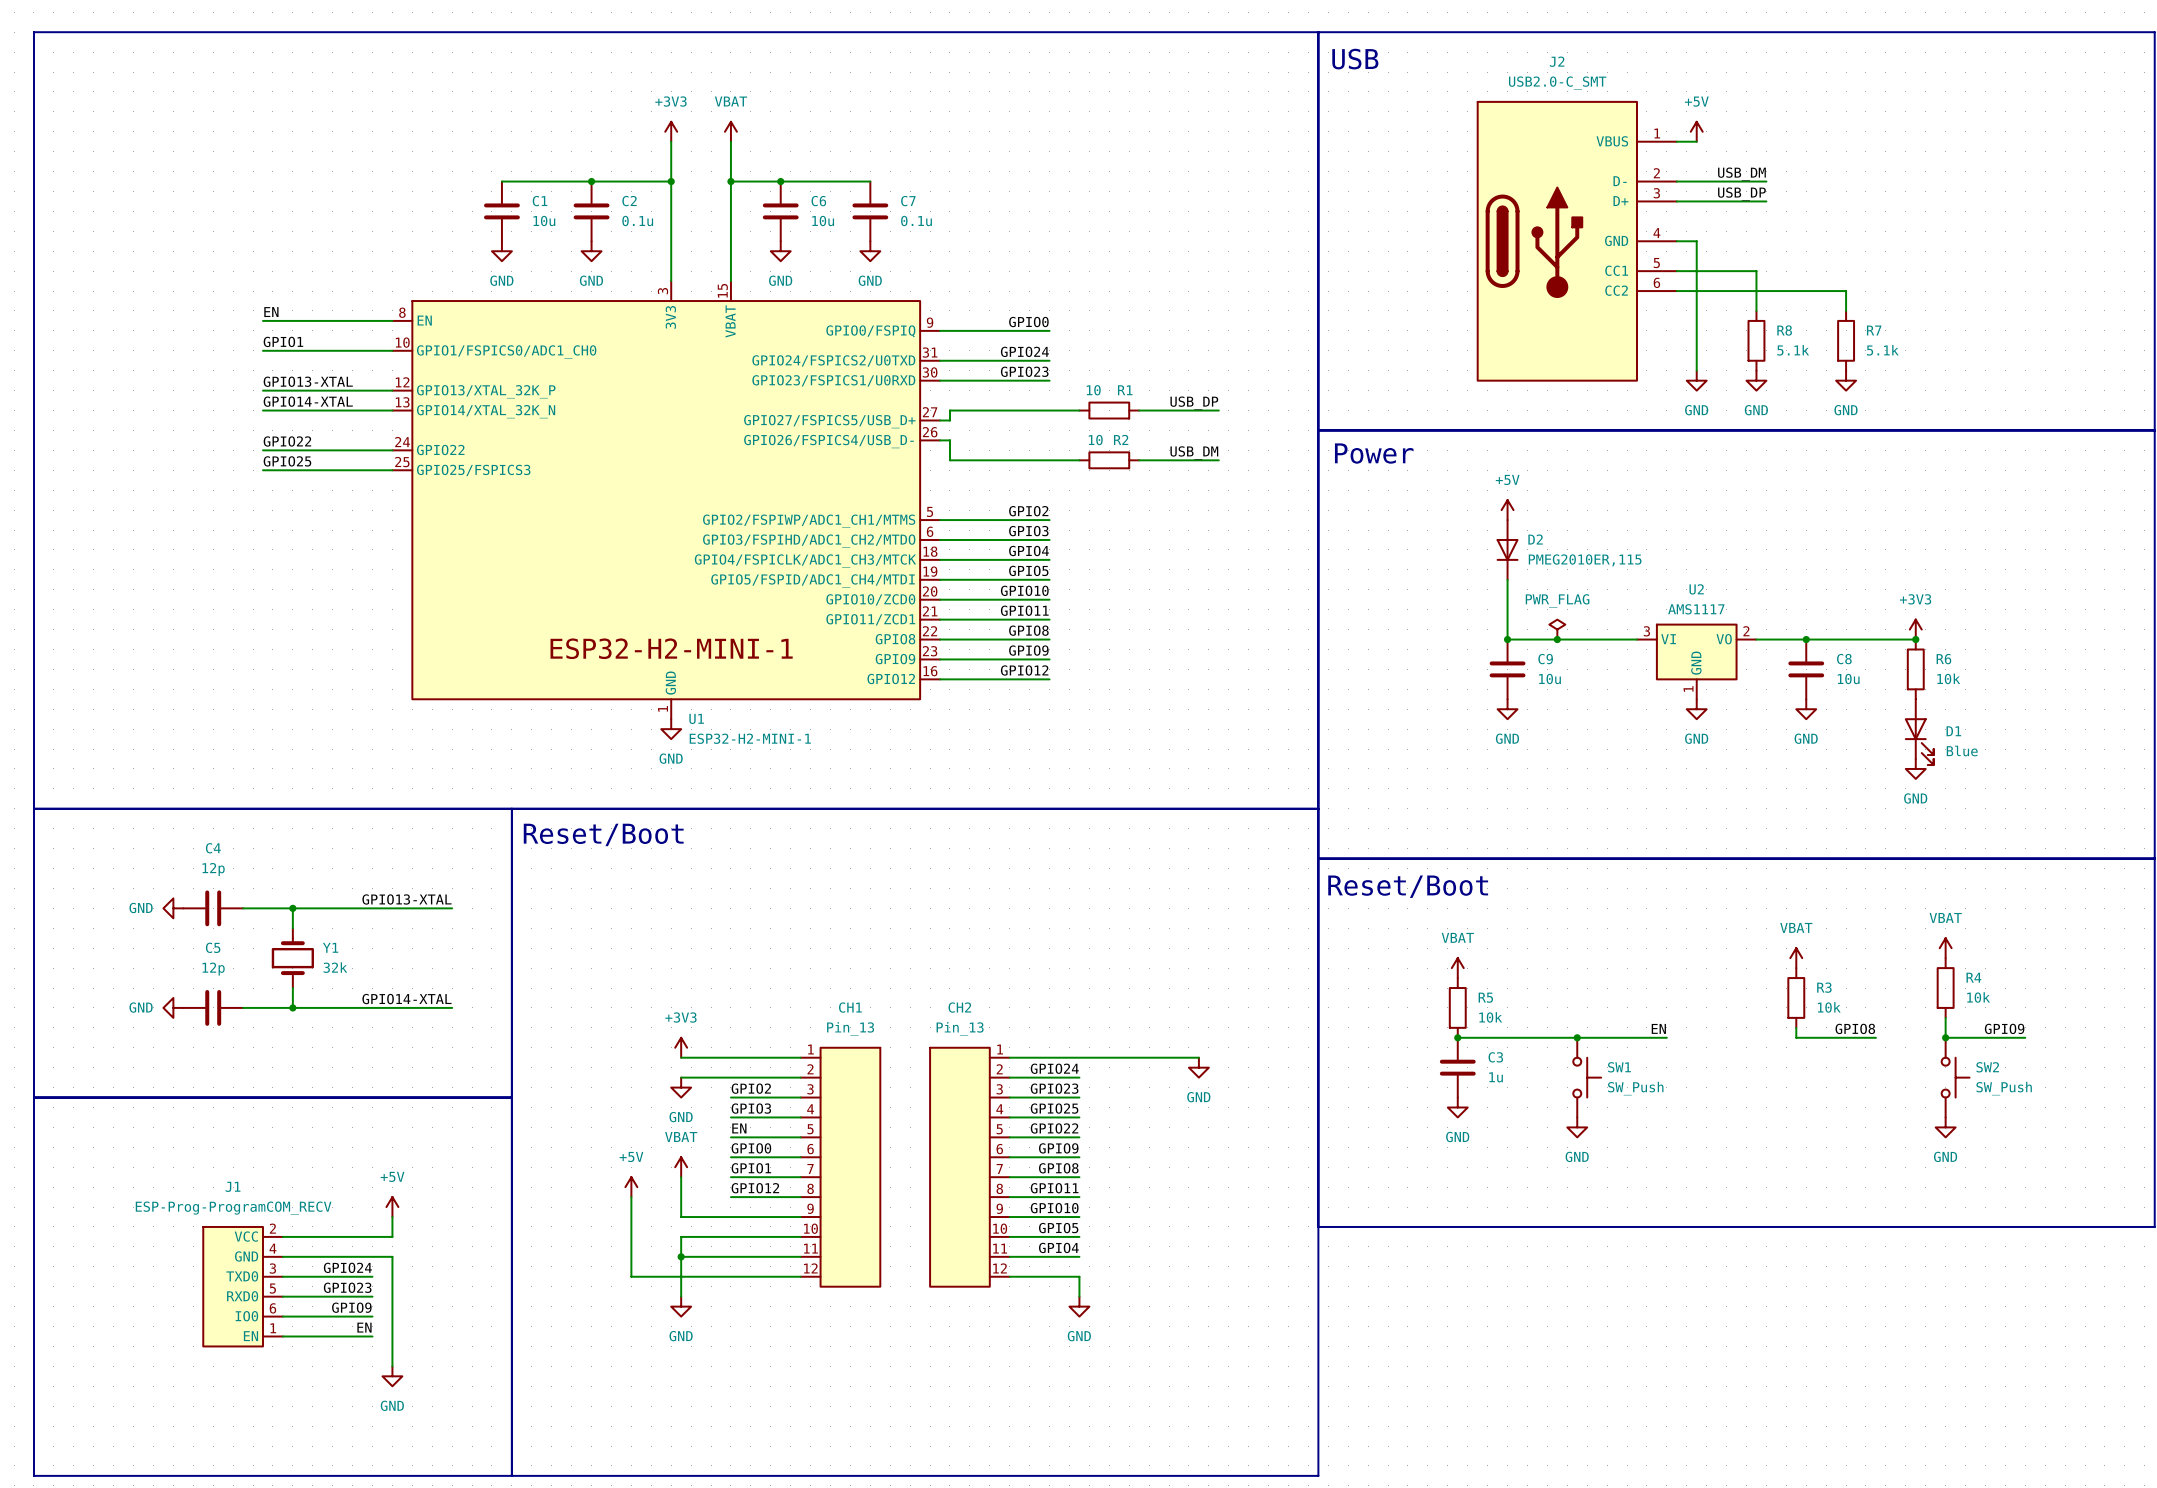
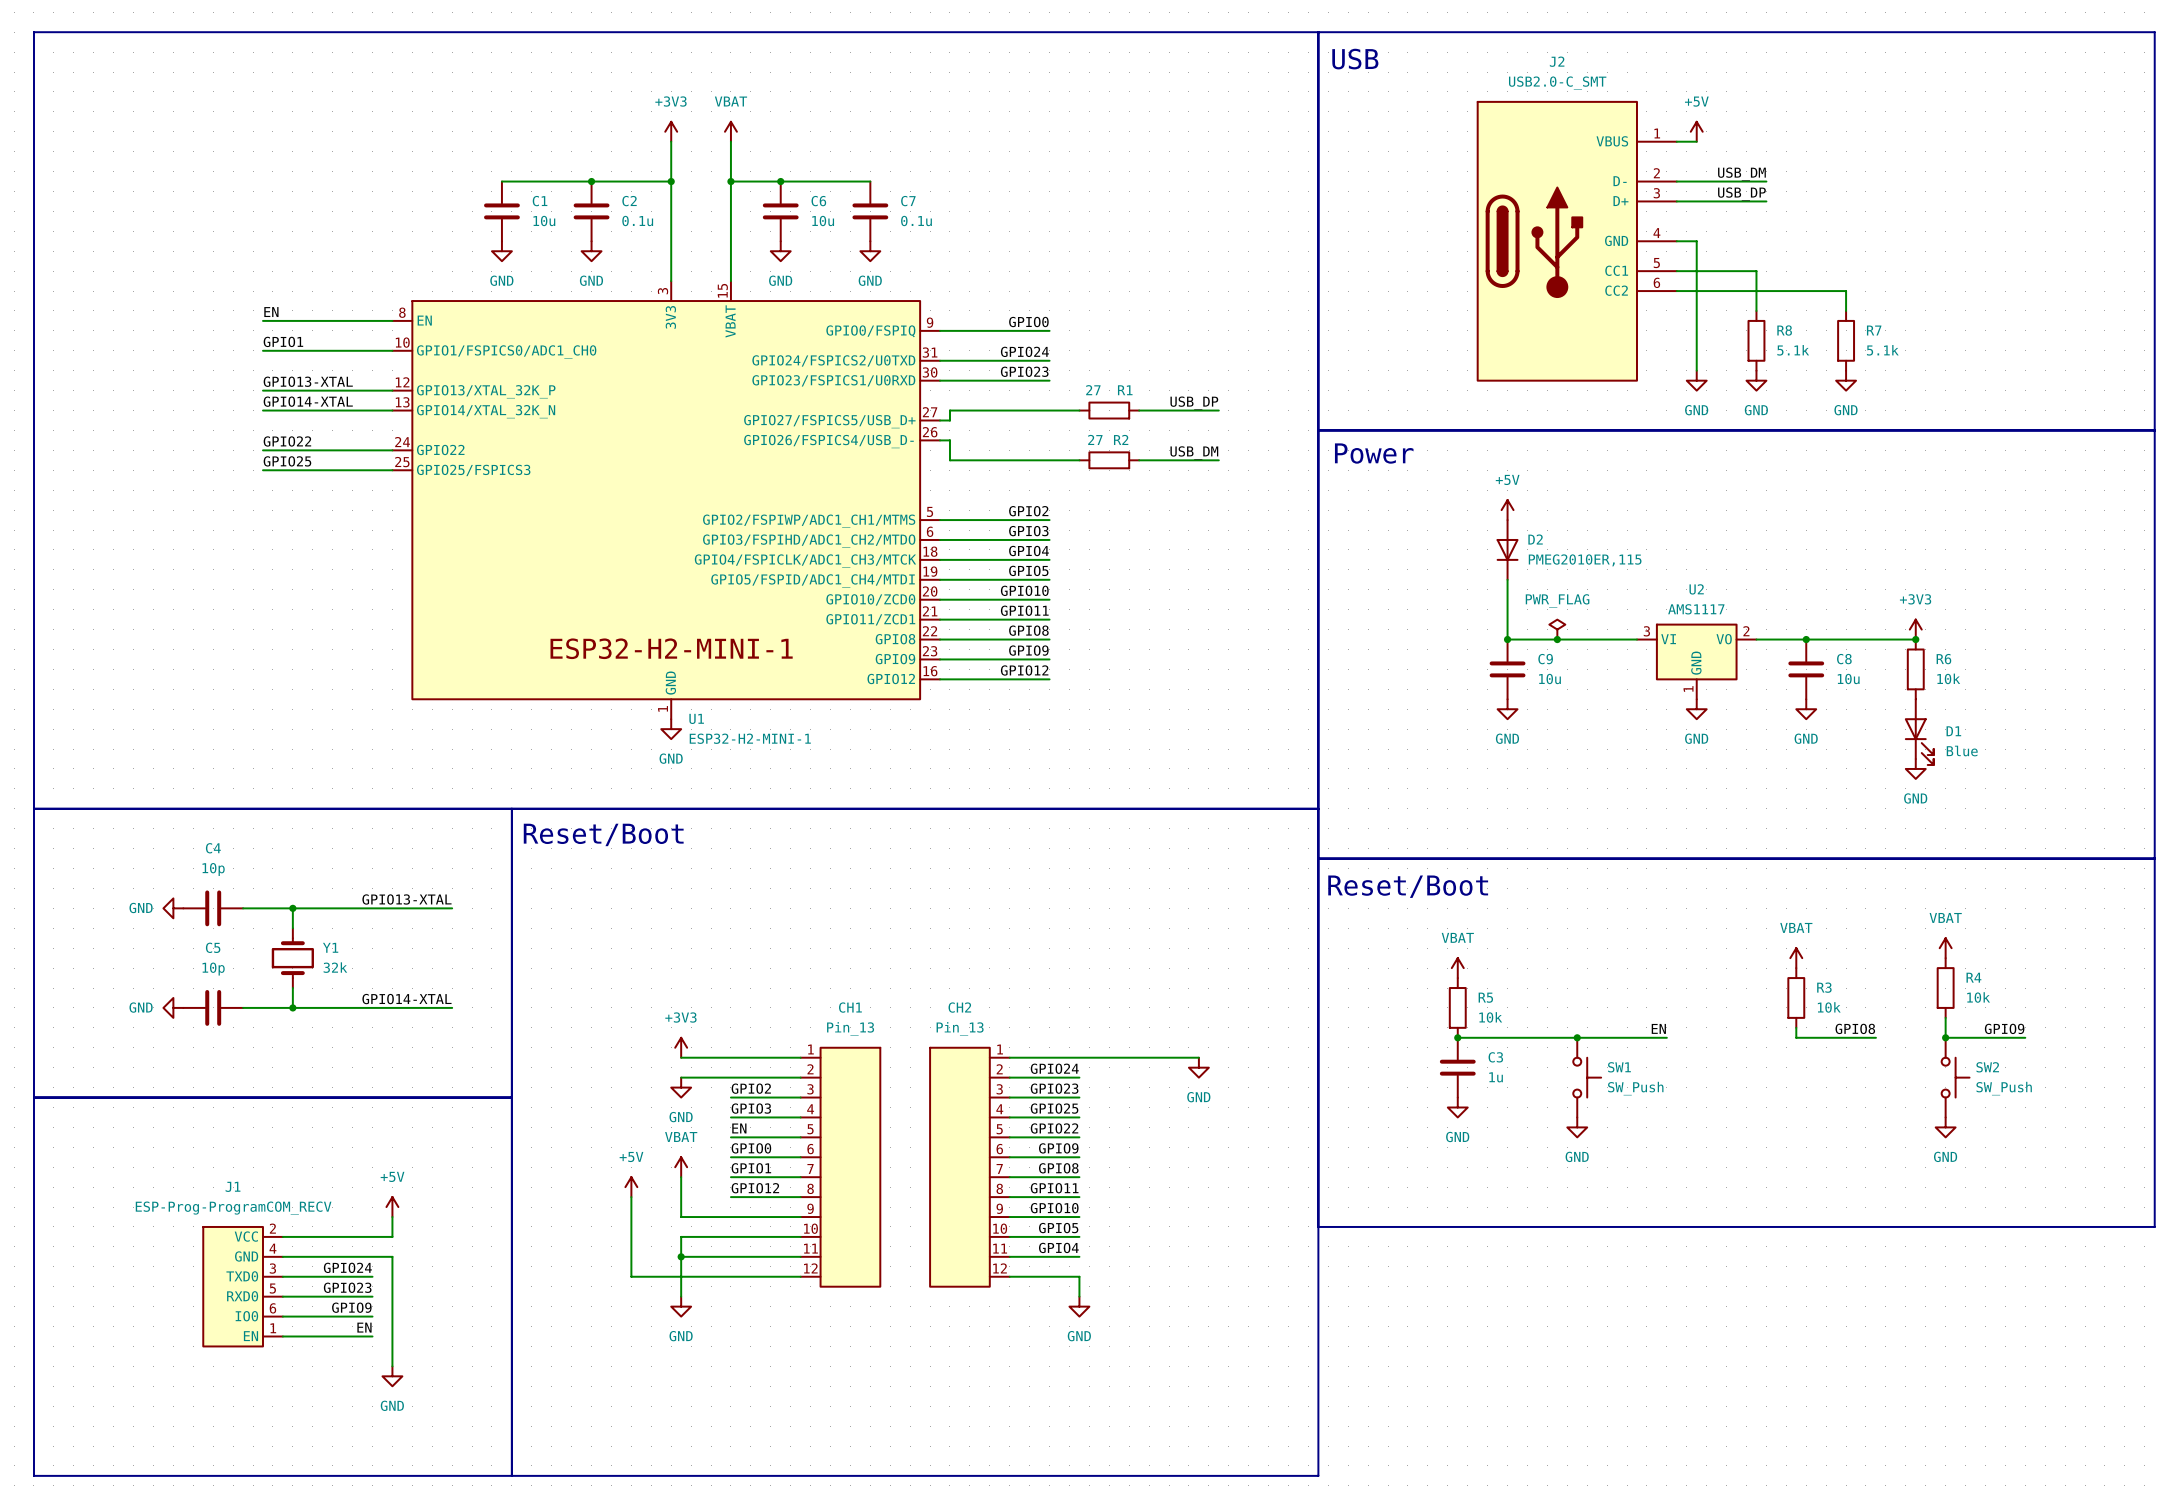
R1 value: 10 (1093, 390) -> 27 (1093, 390)
R2 value: 10 (1095, 440) -> 27 (1095, 439)
C4 value: 12p (213, 869) -> 10p (213, 869)
C5 value: 12p (213, 969) -> 10p (213, 969)

